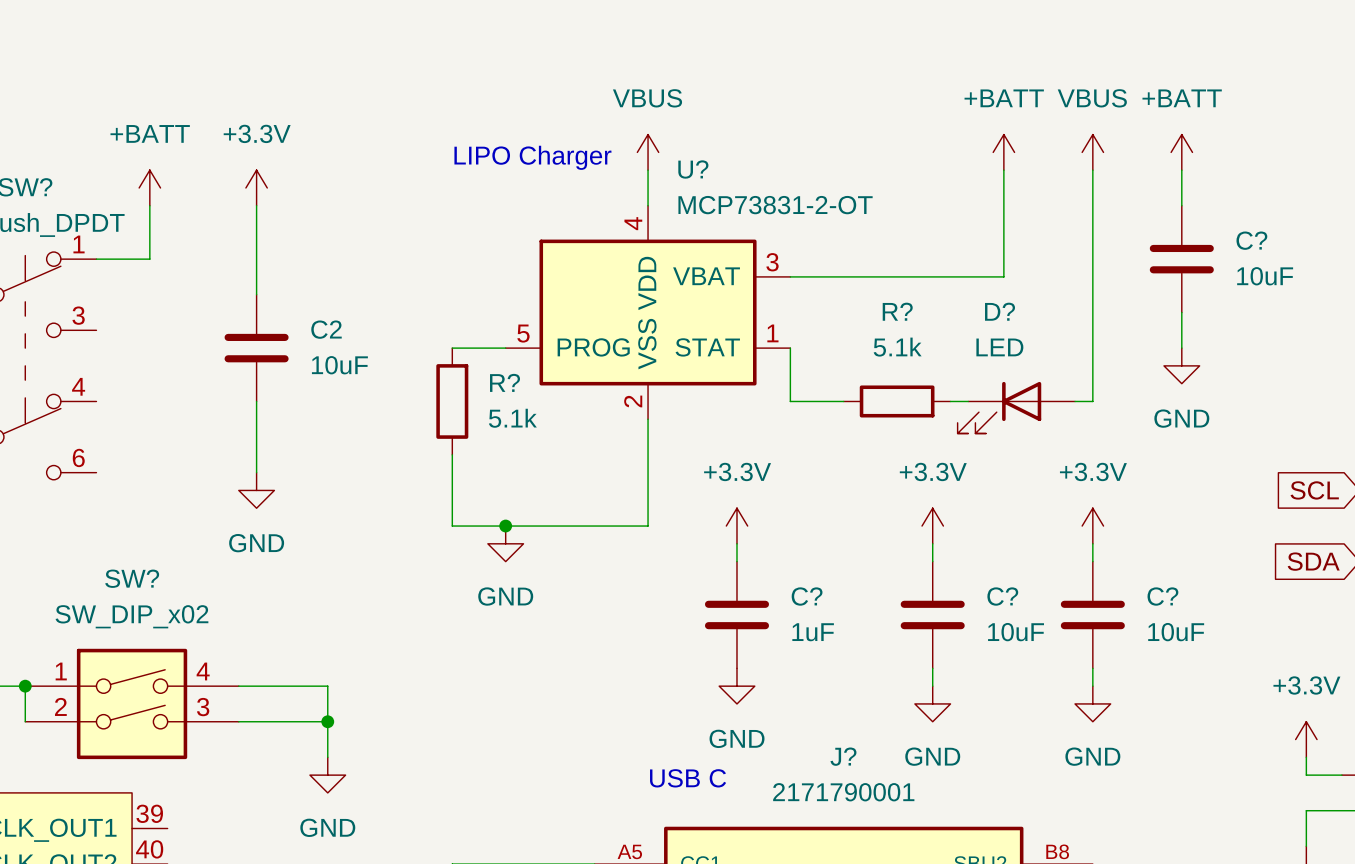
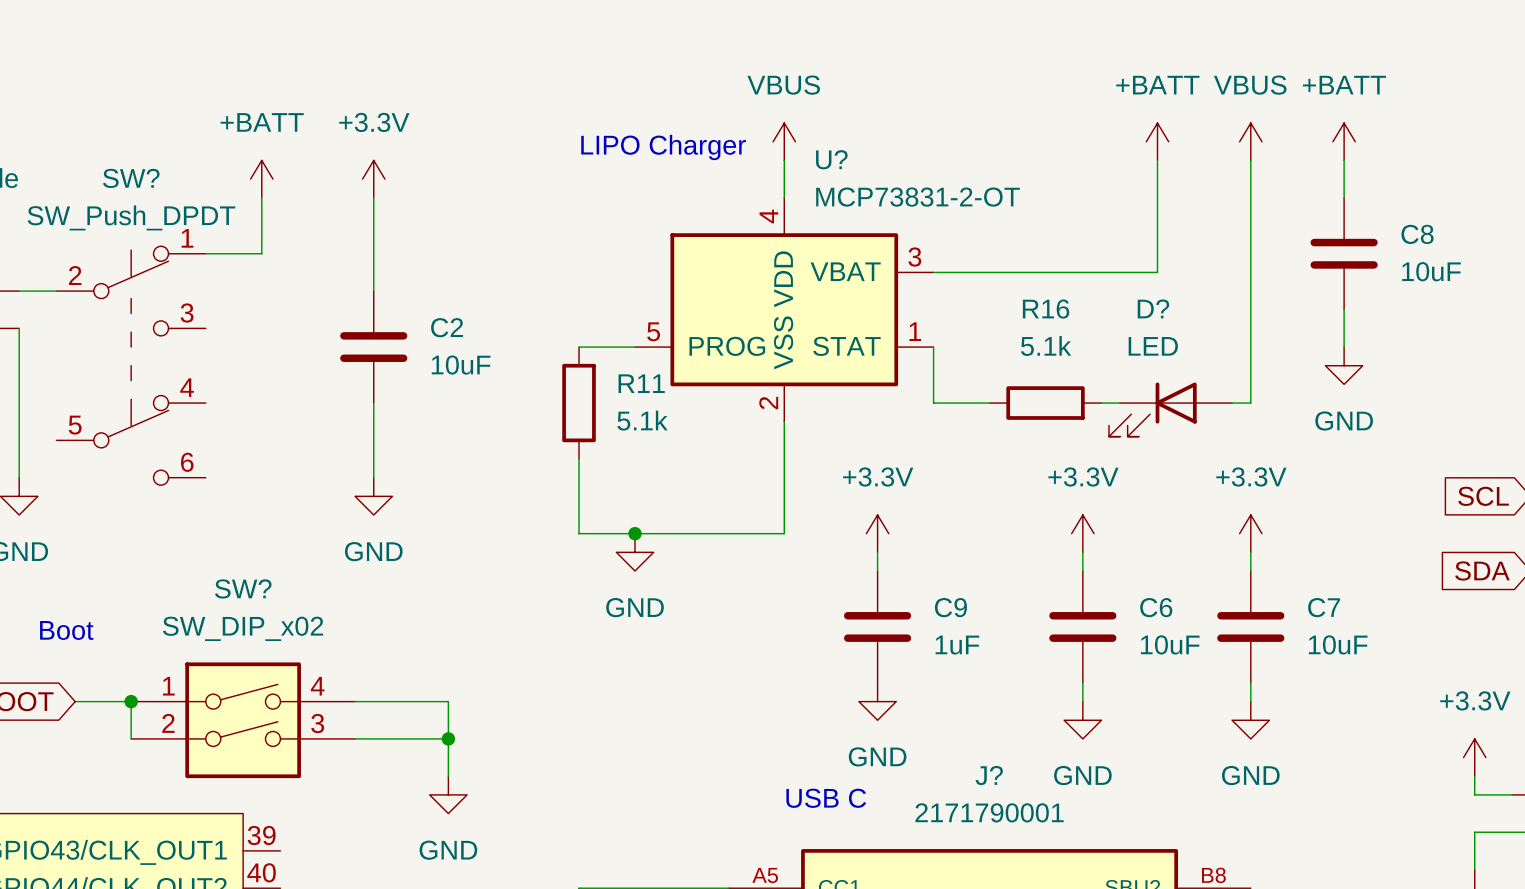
C? name: C? (1251, 240) -> C8 (1417, 234)
R? name: R? (897, 311) -> R16 (1046, 309)
R? name: R? (505, 382) -> R11 (641, 383)
C? name: C? (807, 596) -> C9 (950, 607)
C? name: C? (1002, 596) -> C6 (1156, 607)
C? name: C? (1162, 596) -> C7 (1324, 607)

